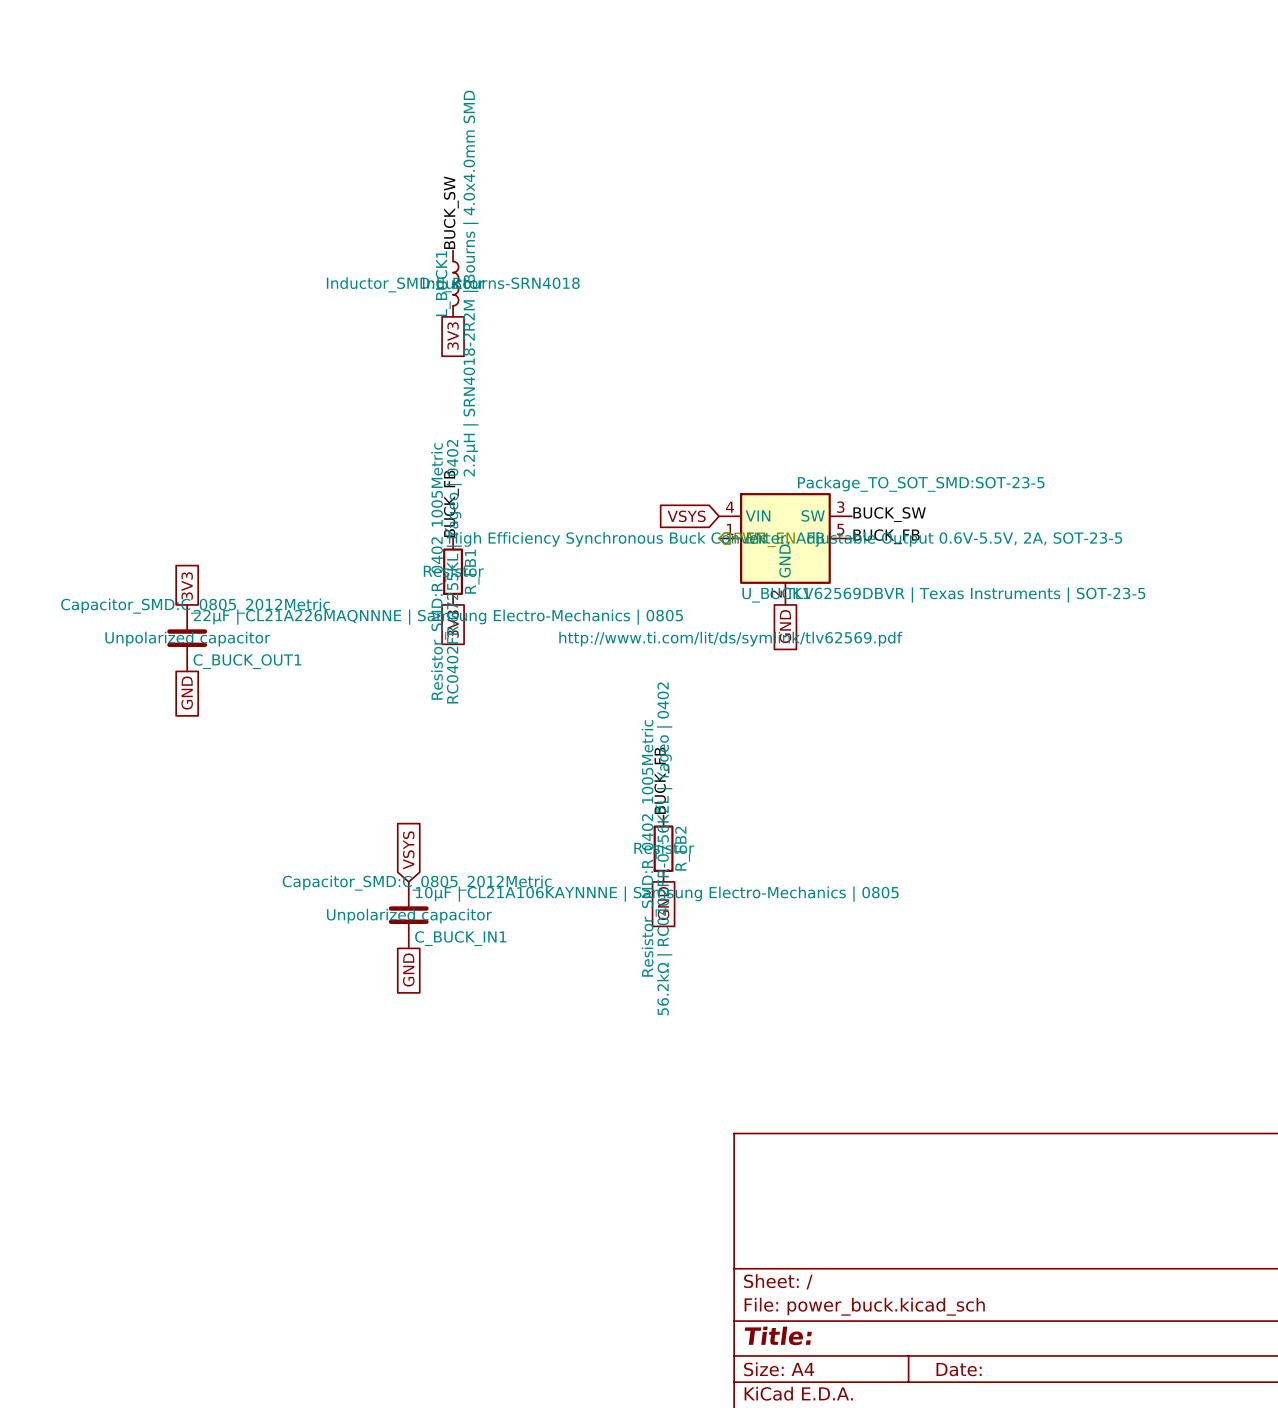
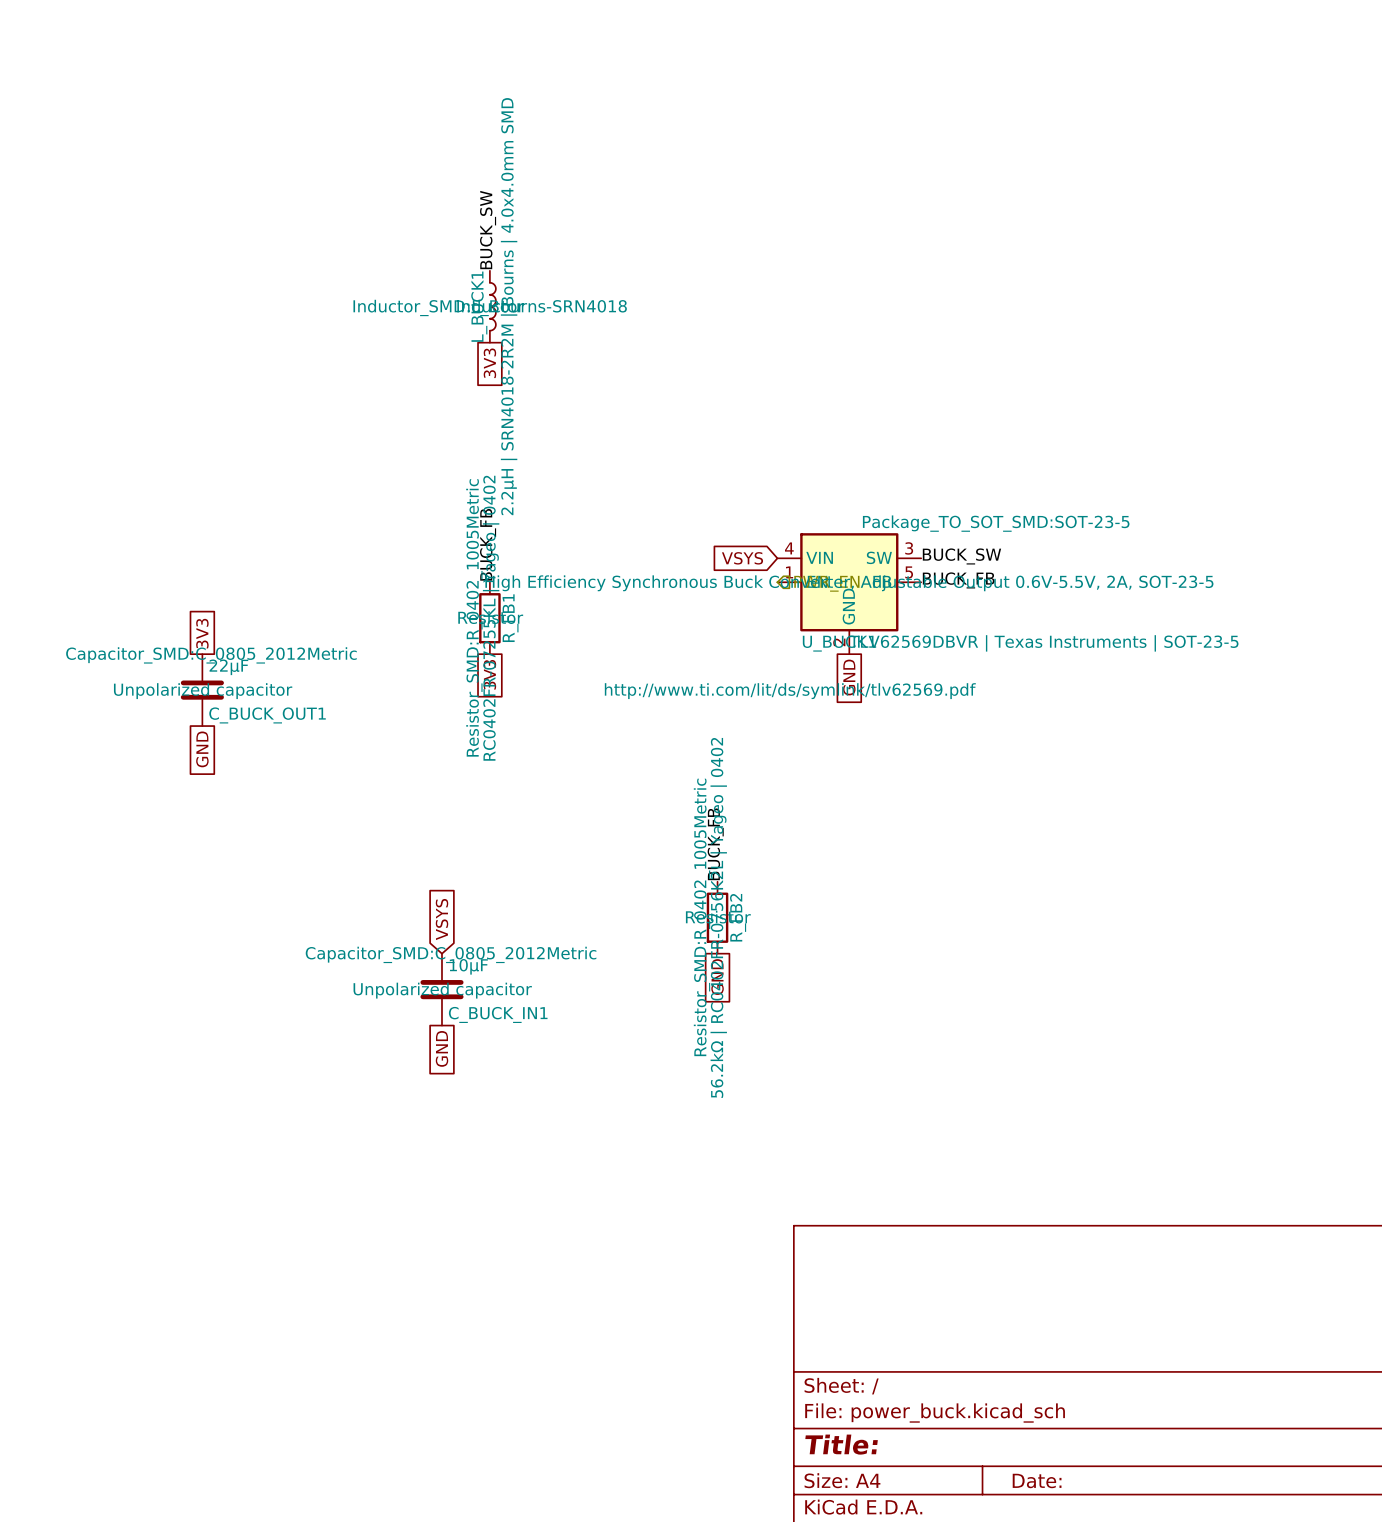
C_BUCK_OUT1 value: 22µF | CL21A226MAQNNNE | Samsung Electro-Mechanics | 0805 (438, 617) -> 22µF (228, 667)
C_BUCK_IN1 value: 10µF | CL21A106KAYNNNE | Samsung Electro-Mechanics | 0805 (657, 894) -> 10µF (468, 966)

